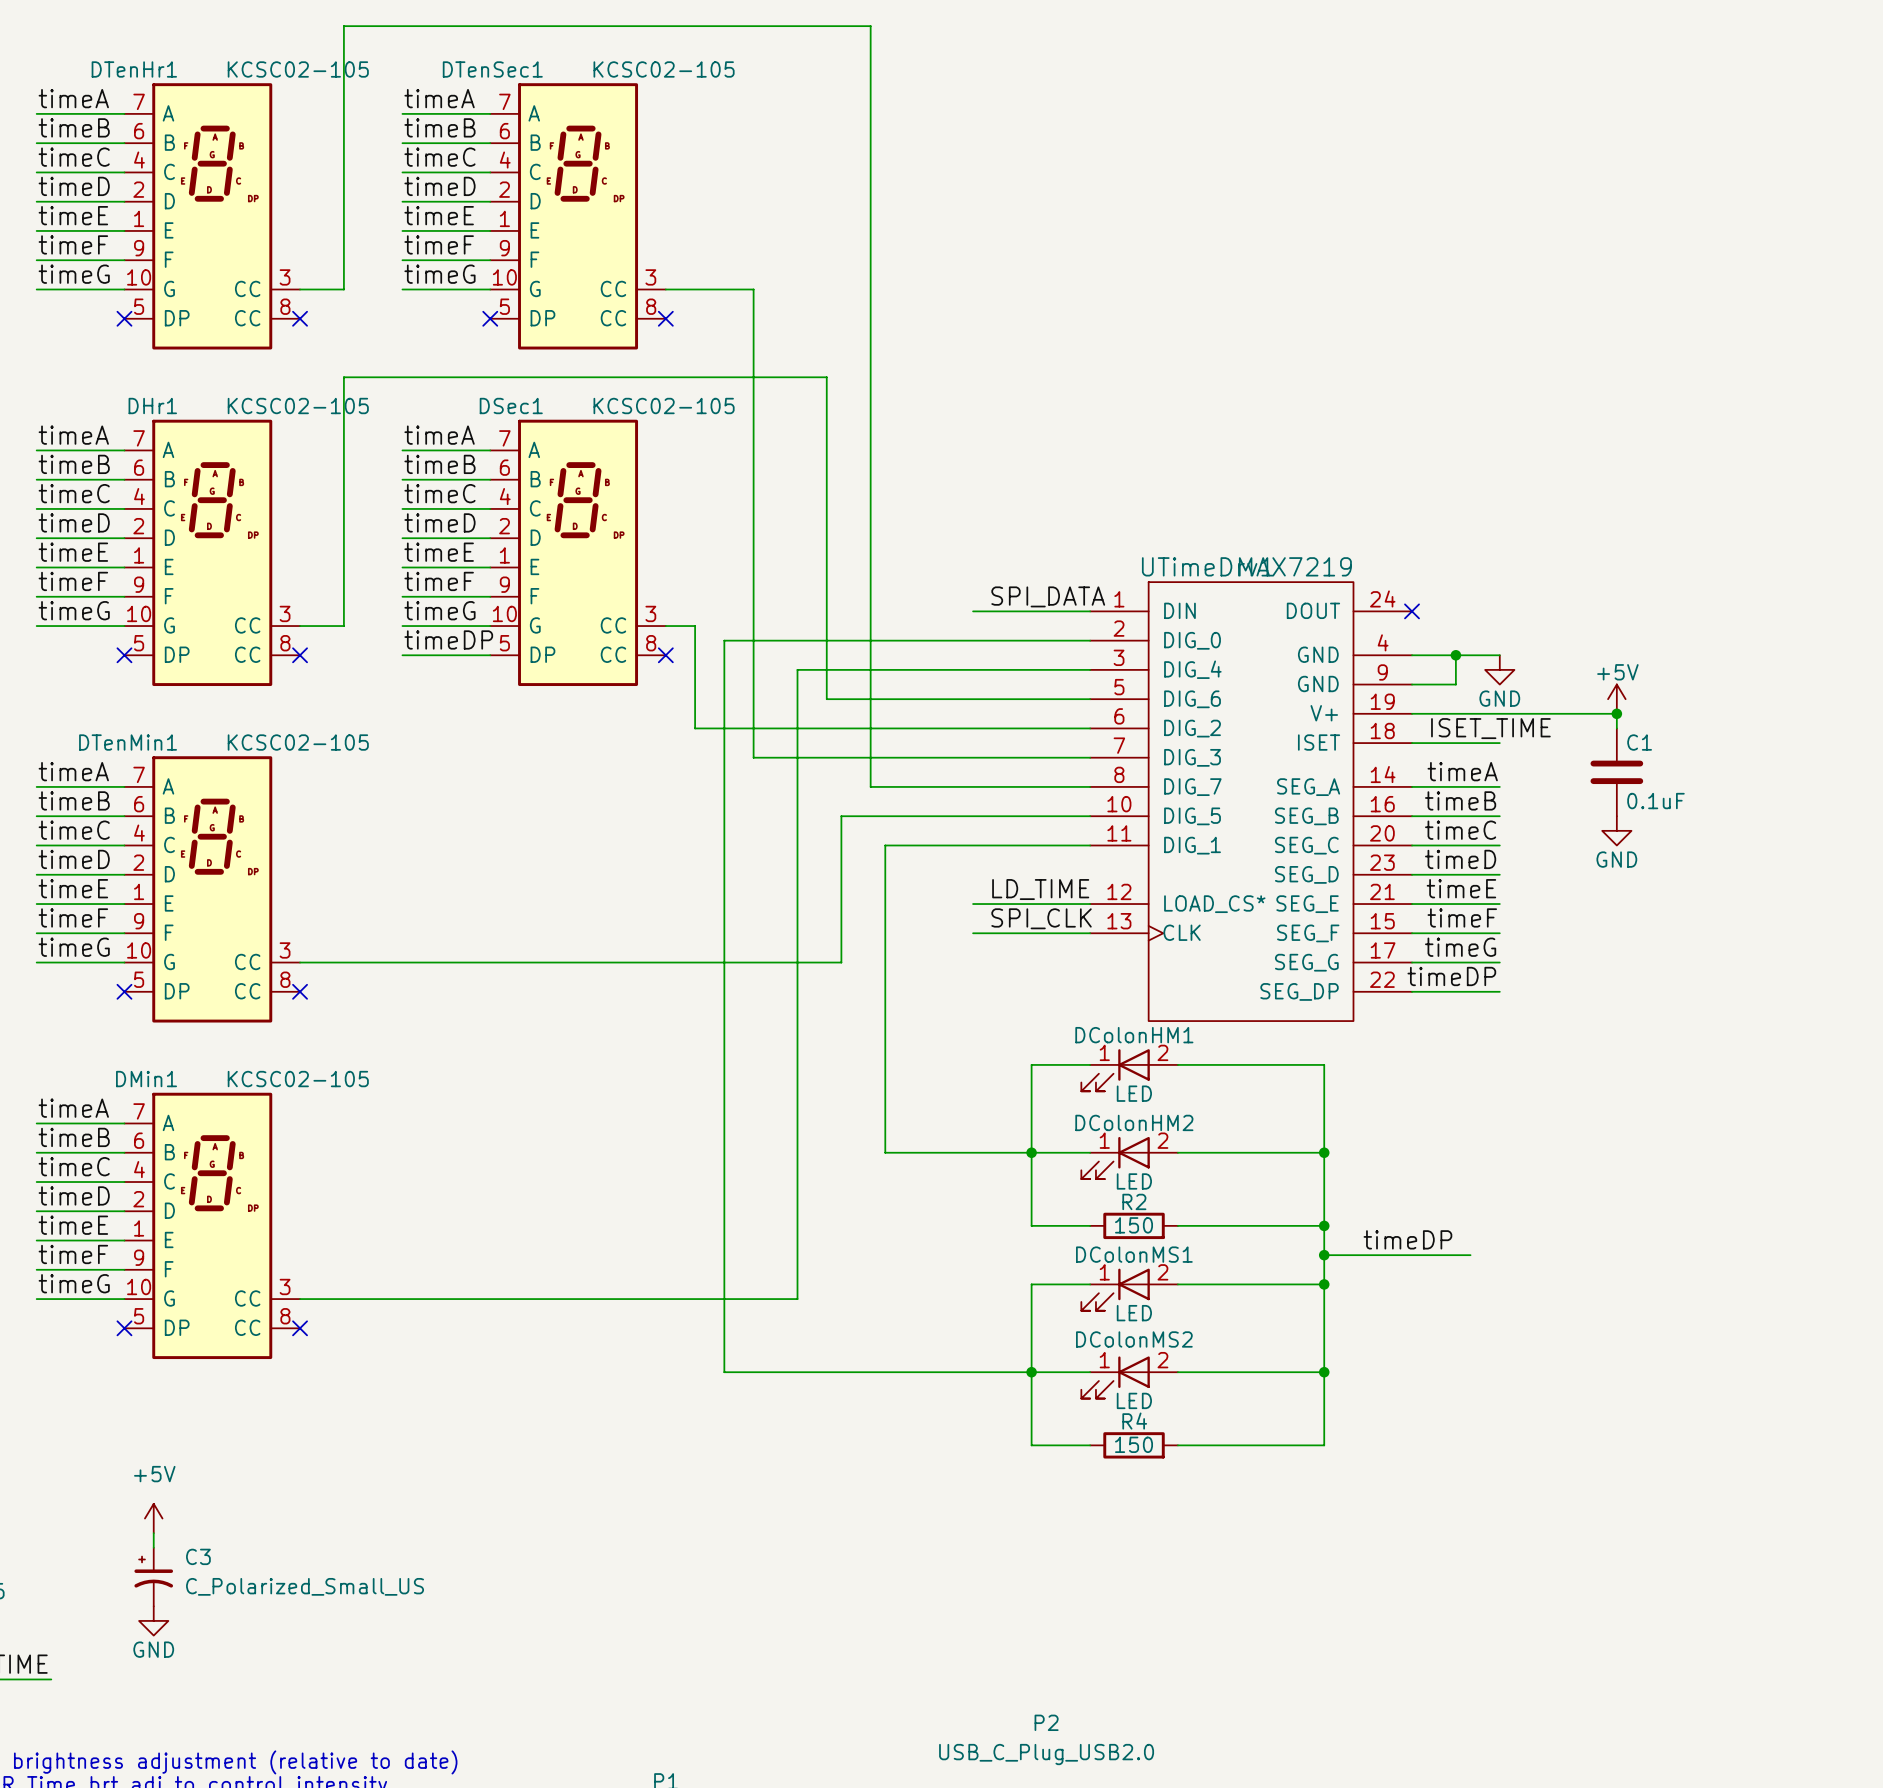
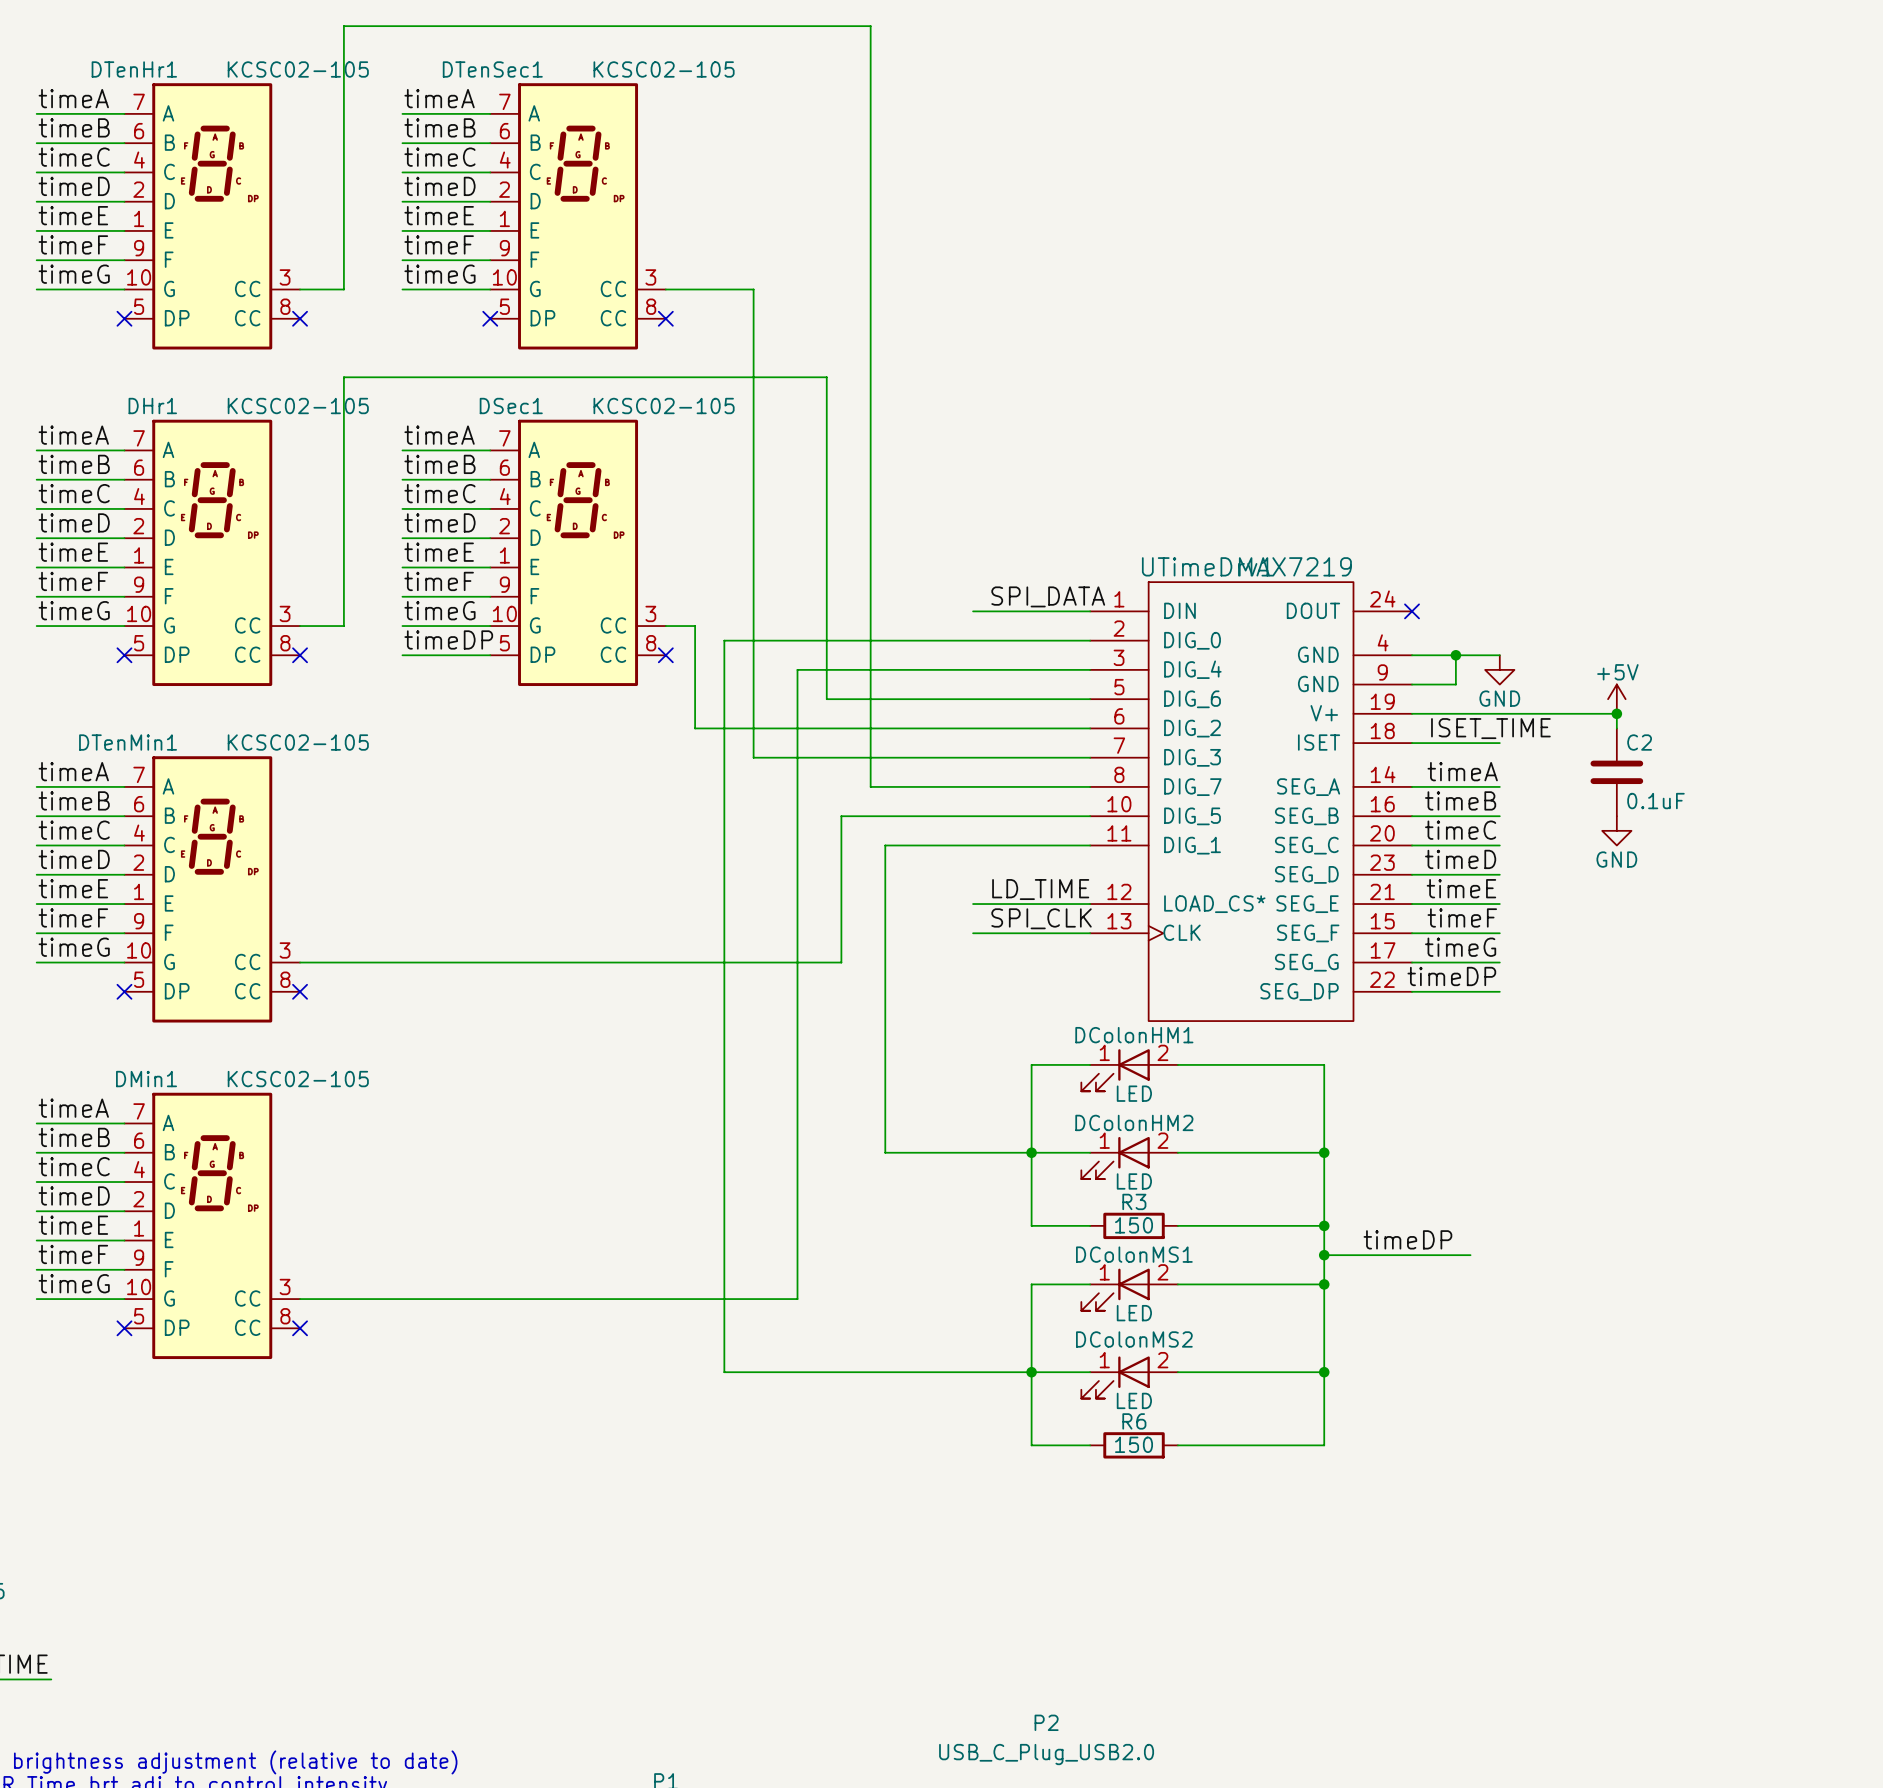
C1 name: C1 (1639, 742) -> C2 (1639, 742)
R2 name: R2 (1134, 1201) -> R3 (1134, 1201)
R4 name: R4 (1134, 1421) -> R6 (1134, 1421)
power symbol: +5V (153, 1518) -> none
wire: (153, 1533) (153, 1547) -> none
C3: C_Polarized_Small_US (153, 1577) -> none
power symbol: GND (153, 1620) -> none

